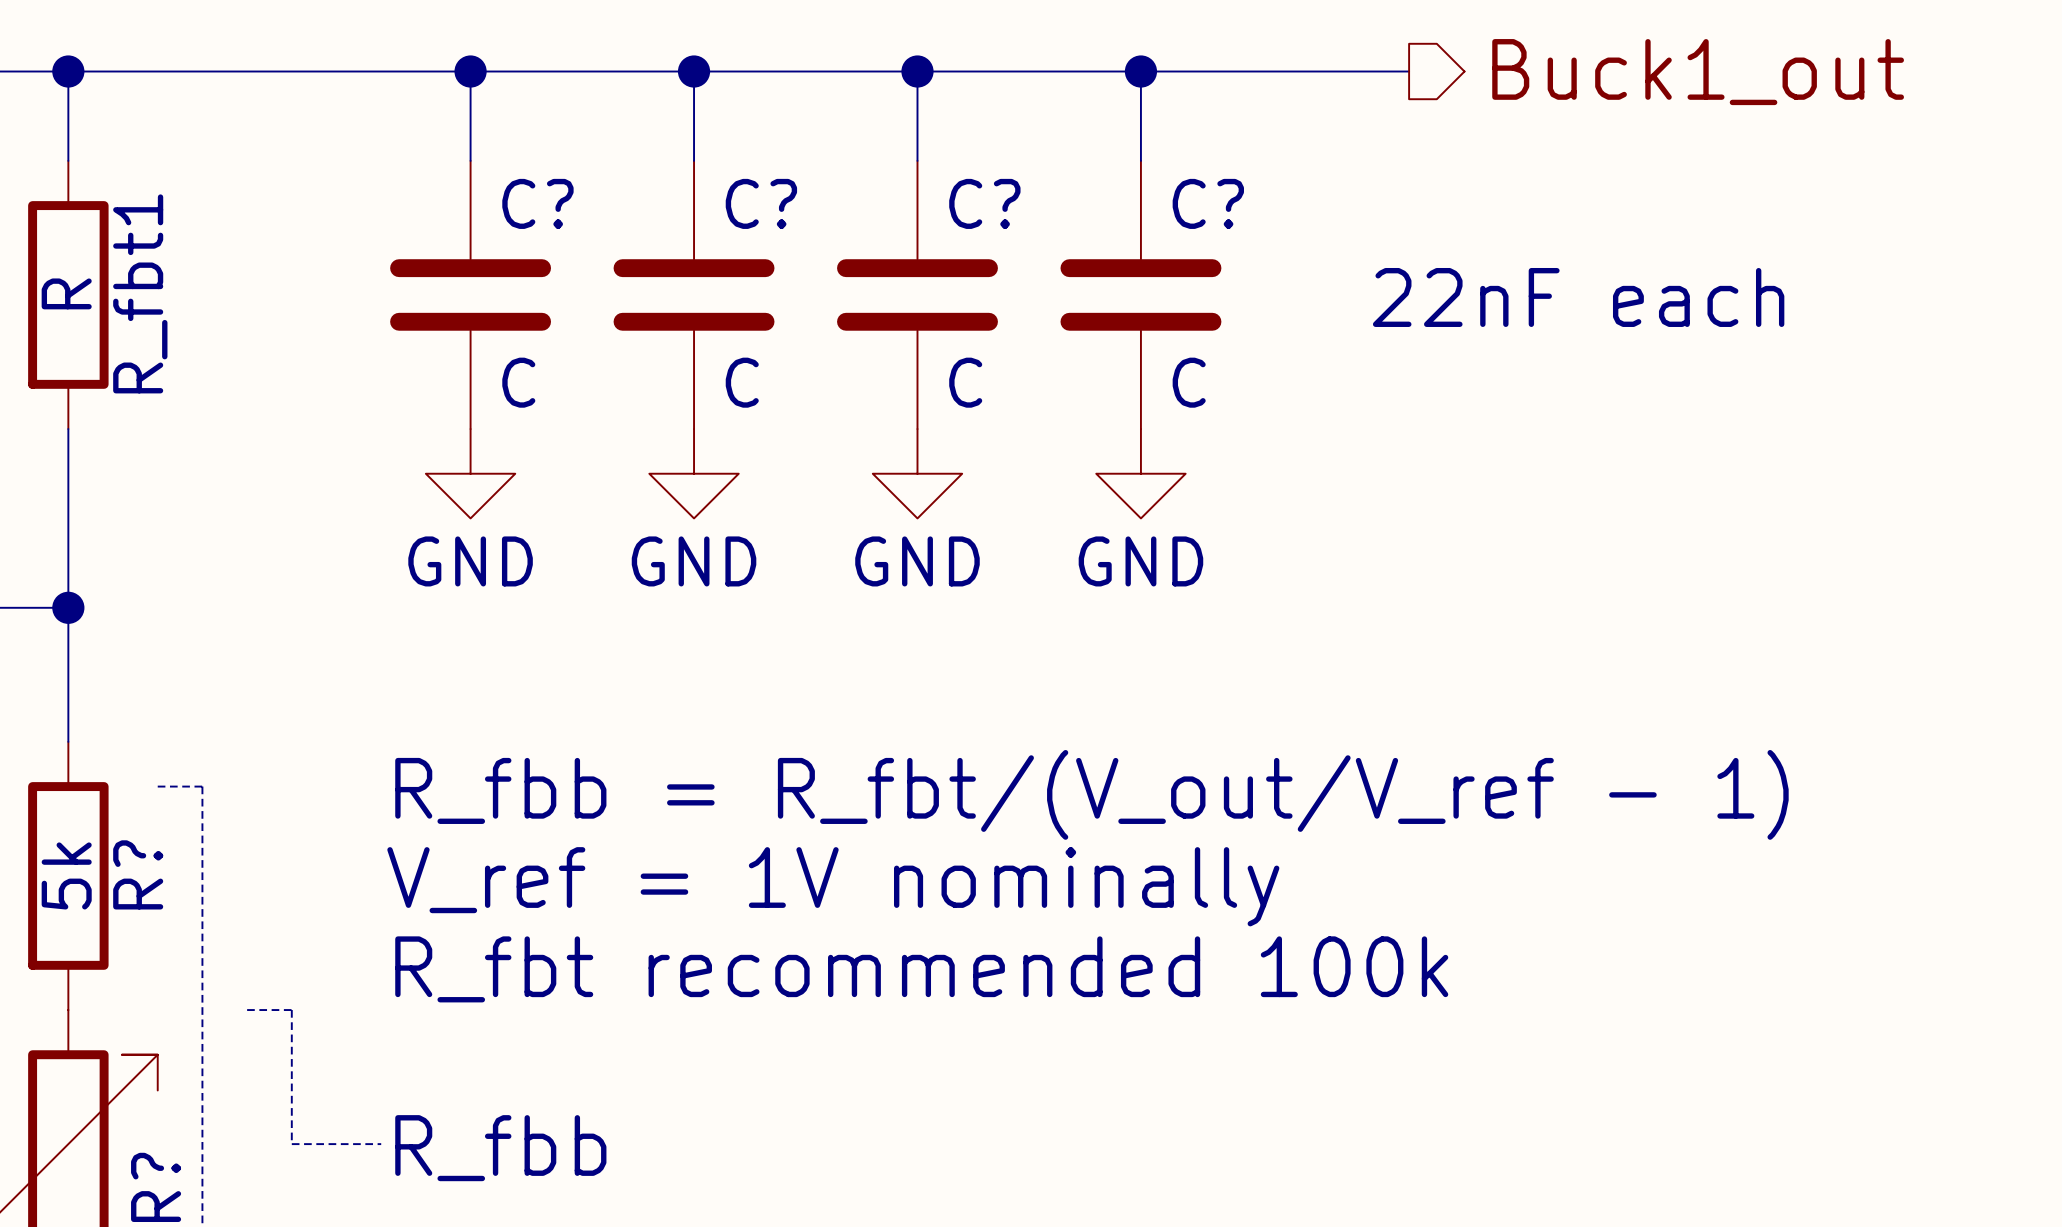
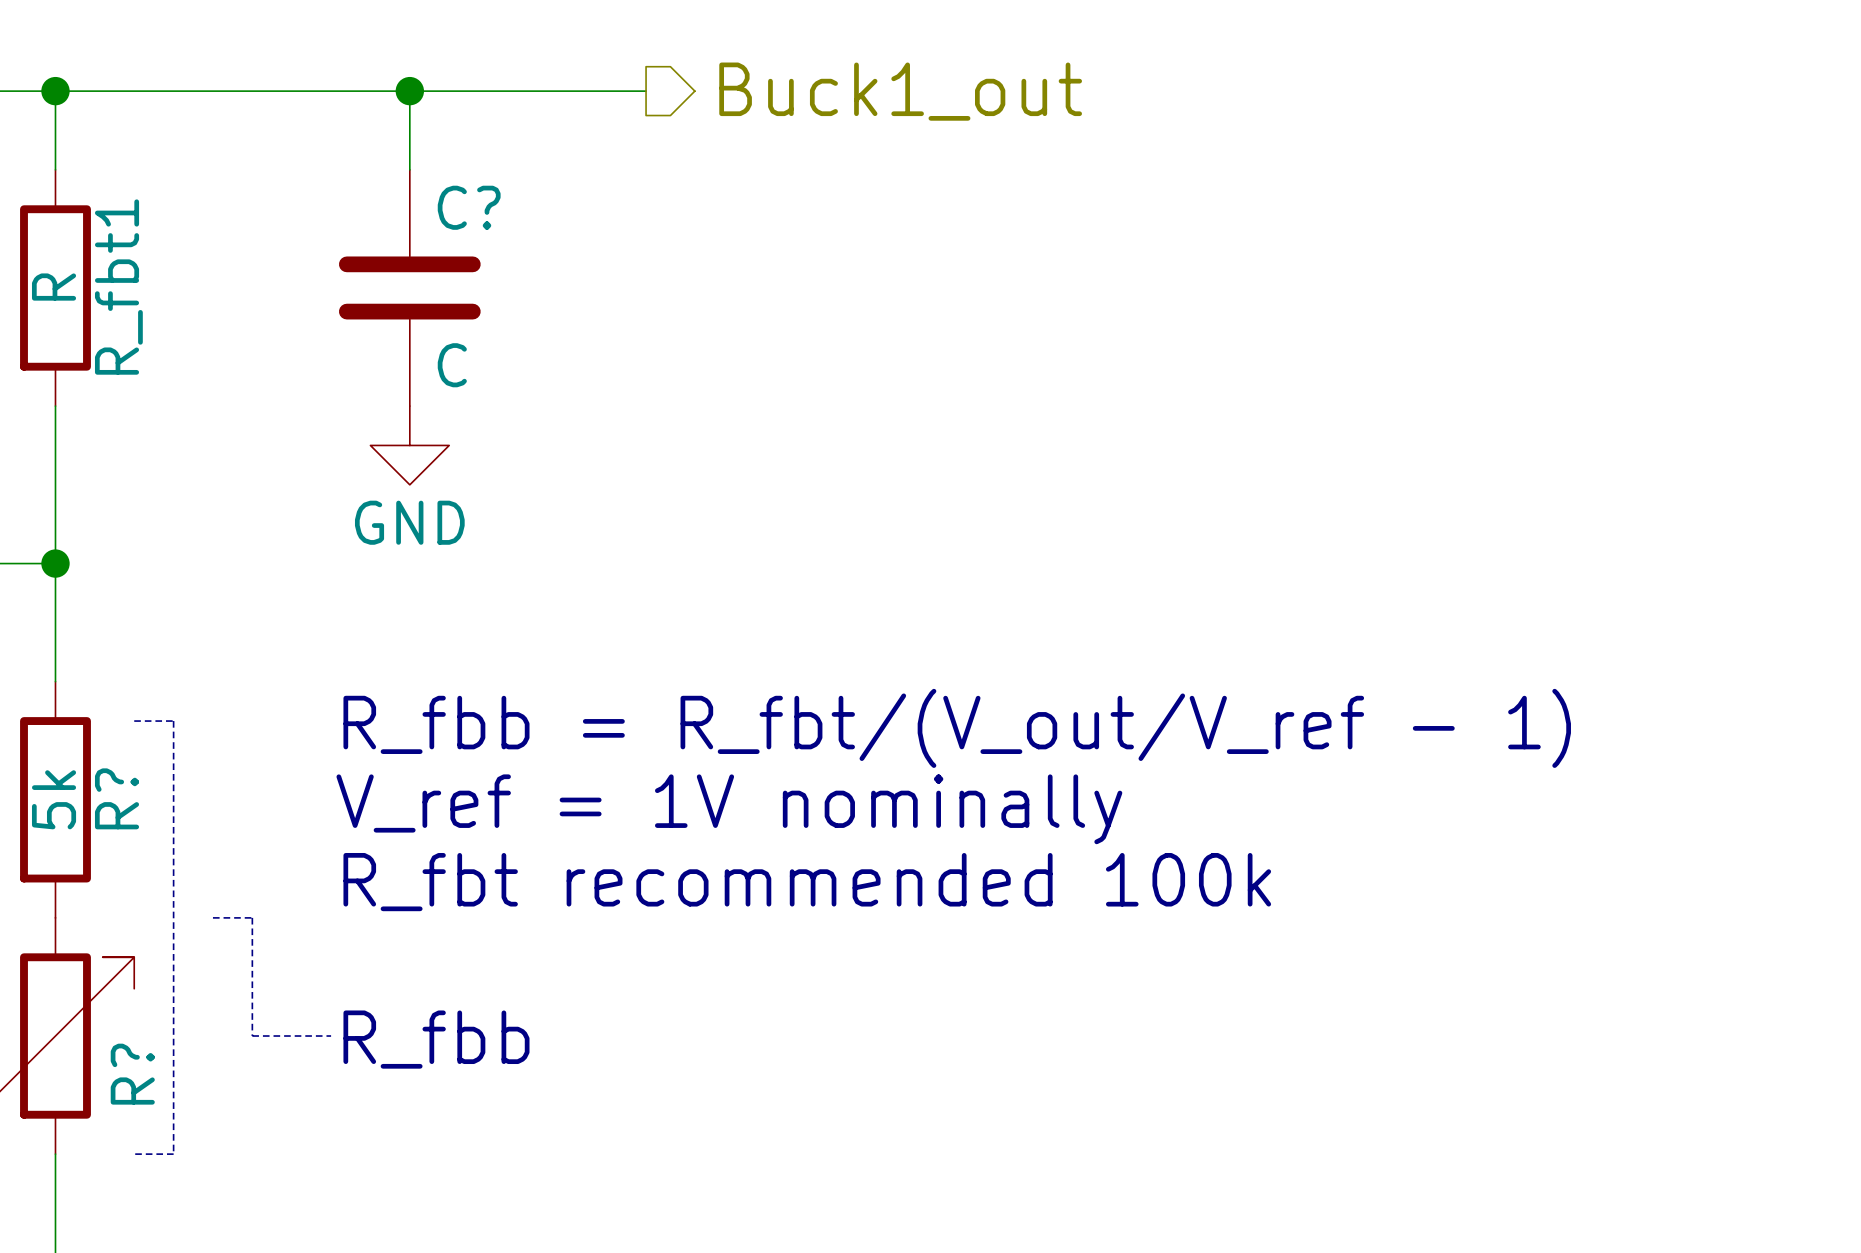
wire: (694, 71) (694, 160) -> none
junction: (694, 71) -> none
wire: (738, 71) (1409, 71) -> none
wire: (917, 71) (917, 160) -> none
junction: (917, 71) -> none
wire: (1140, 71) (1140, 160) -> none
junction: (1140, 71) -> none
hierarchical label position: Buck1_out (1698, 72) -> Buck1_out (900, 91)
C?: C (694, 294) -> none
C?: C (917, 294) -> none
C?: C (1140, 294) -> none
text: 22nF each (1578, 297) -> none
power symbol: GND (694, 473) -> none
power symbol: GND (917, 473) -> none
power symbol: GND (1140, 473) -> none

